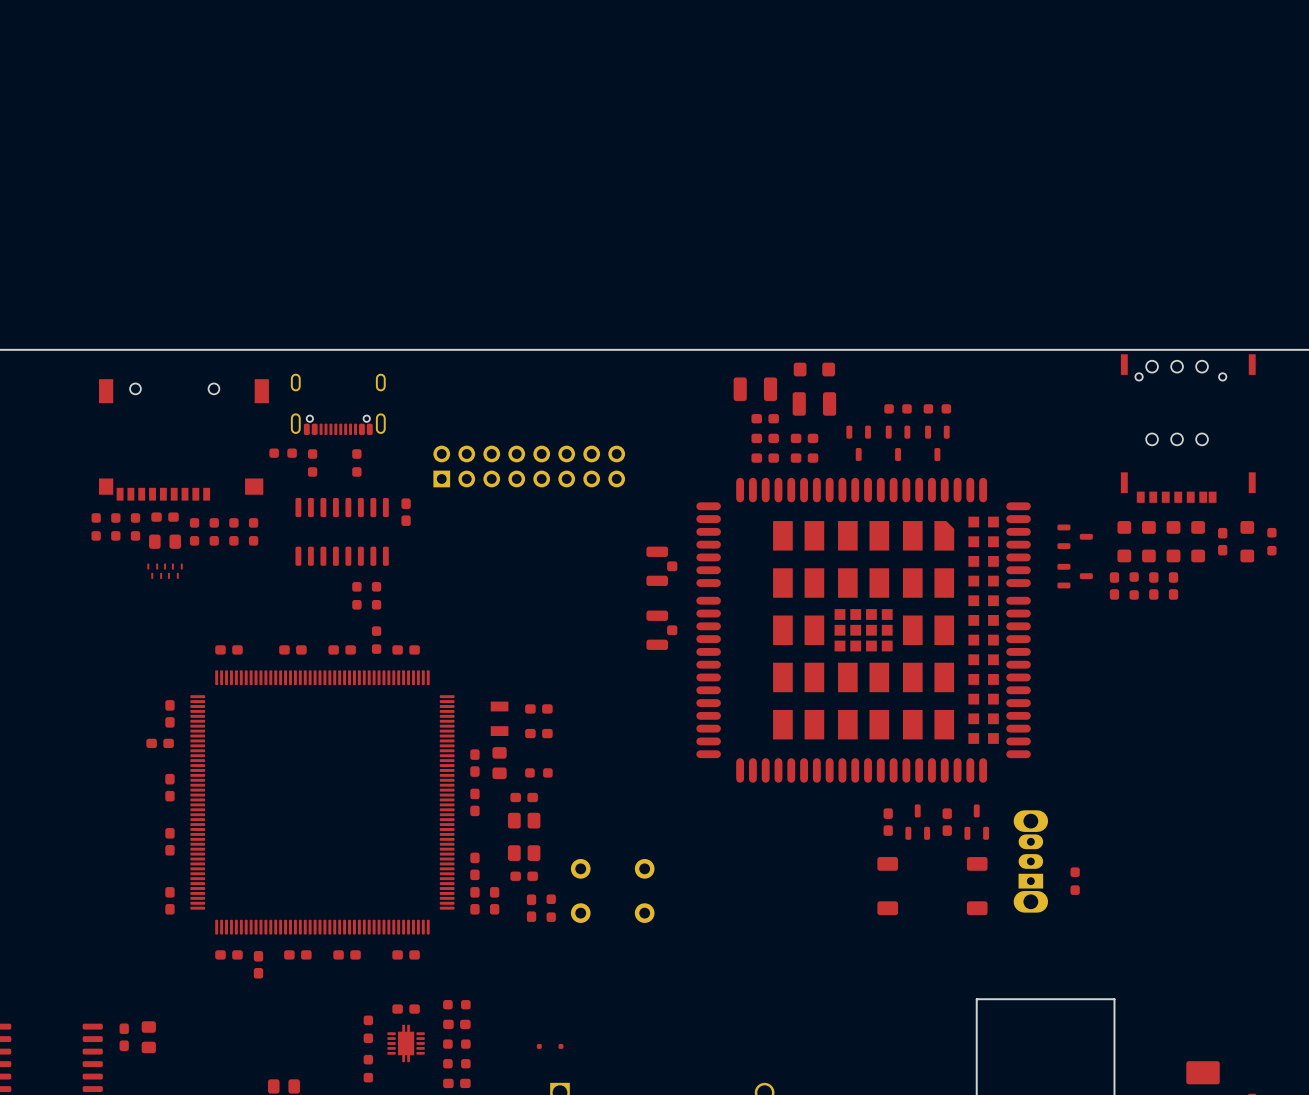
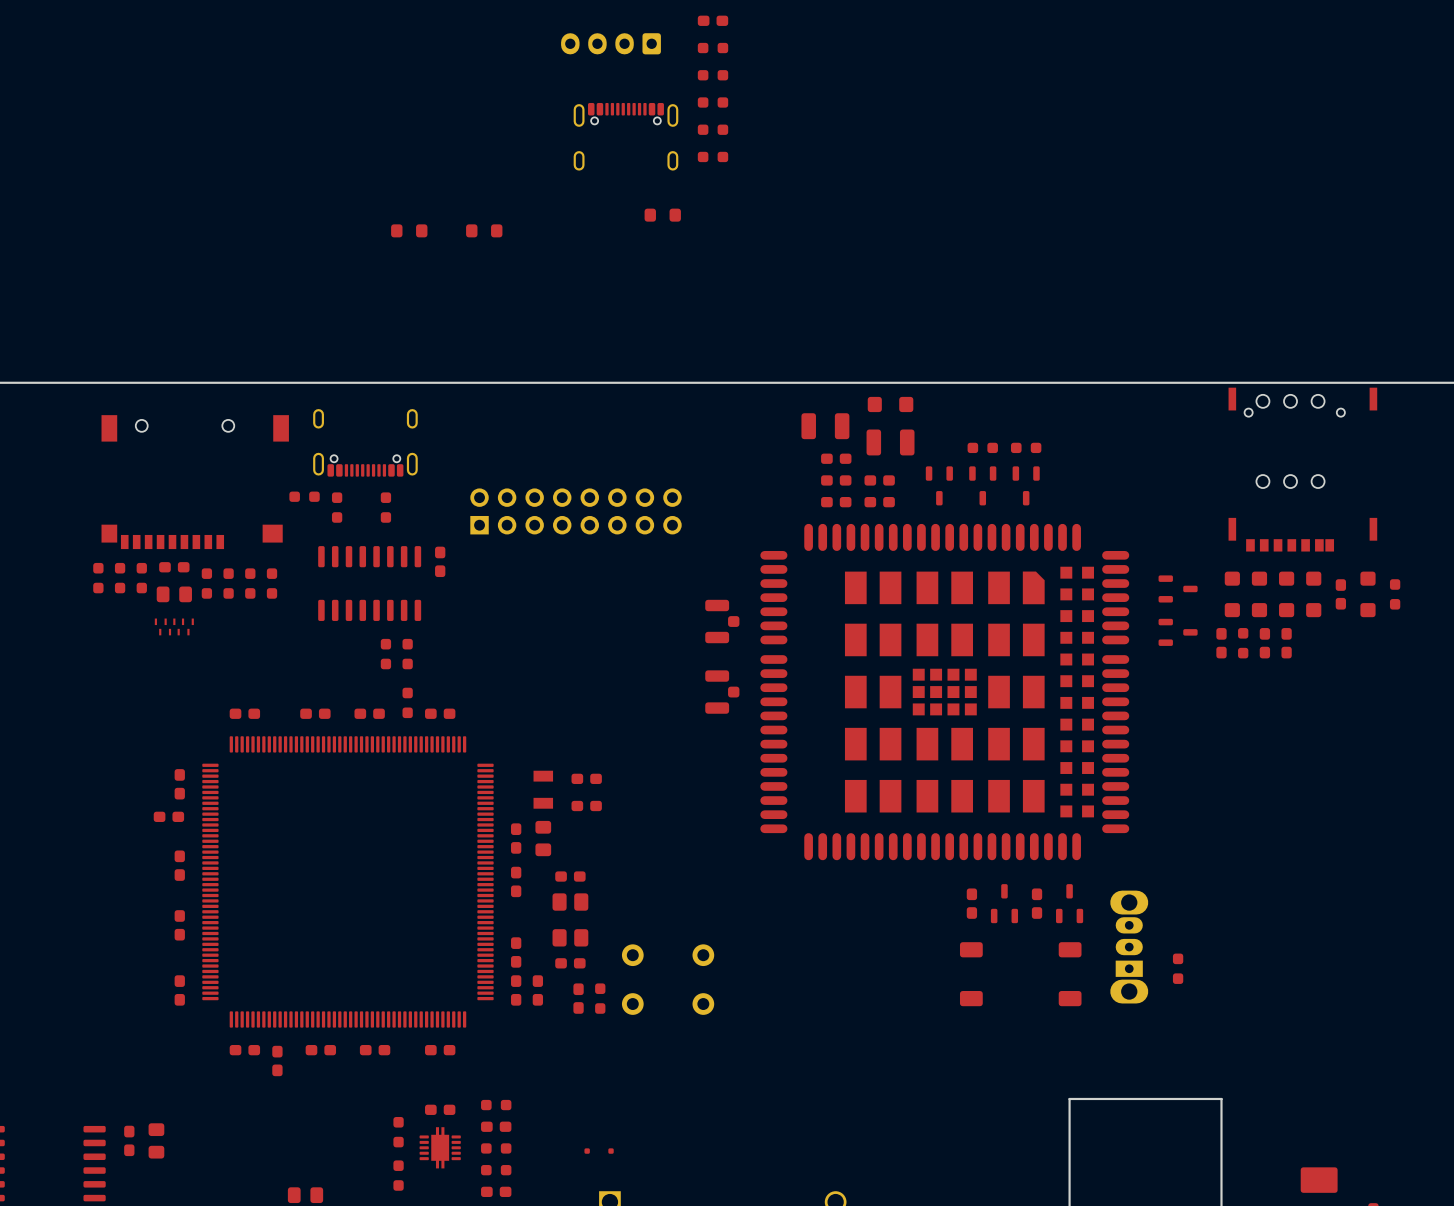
part: none -> (713, 20)
part: none -> (611, 43)
part: none -> (713, 48)
part: none -> (713, 75)
part: none -> (713, 102)
part: none -> (713, 129)
part: none -> (625, 136)
part: none -> (713, 156)
part: none -> (662, 215)
part: none -> (409, 230)
part: none -> (484, 230)
part: (538, 772) -> none

